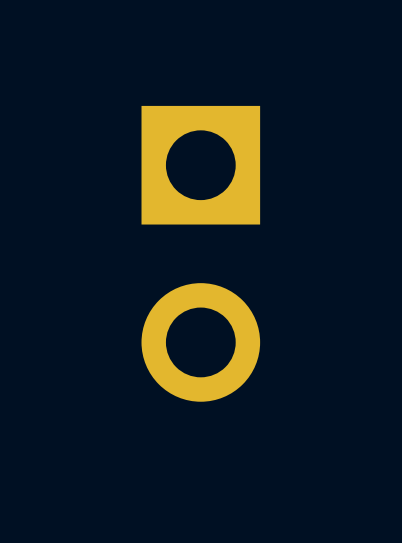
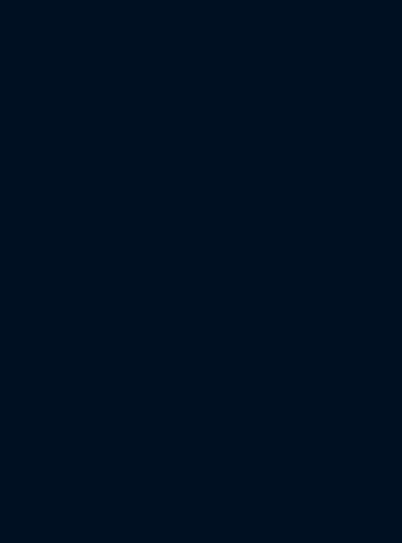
part: (200, 253) -> none

